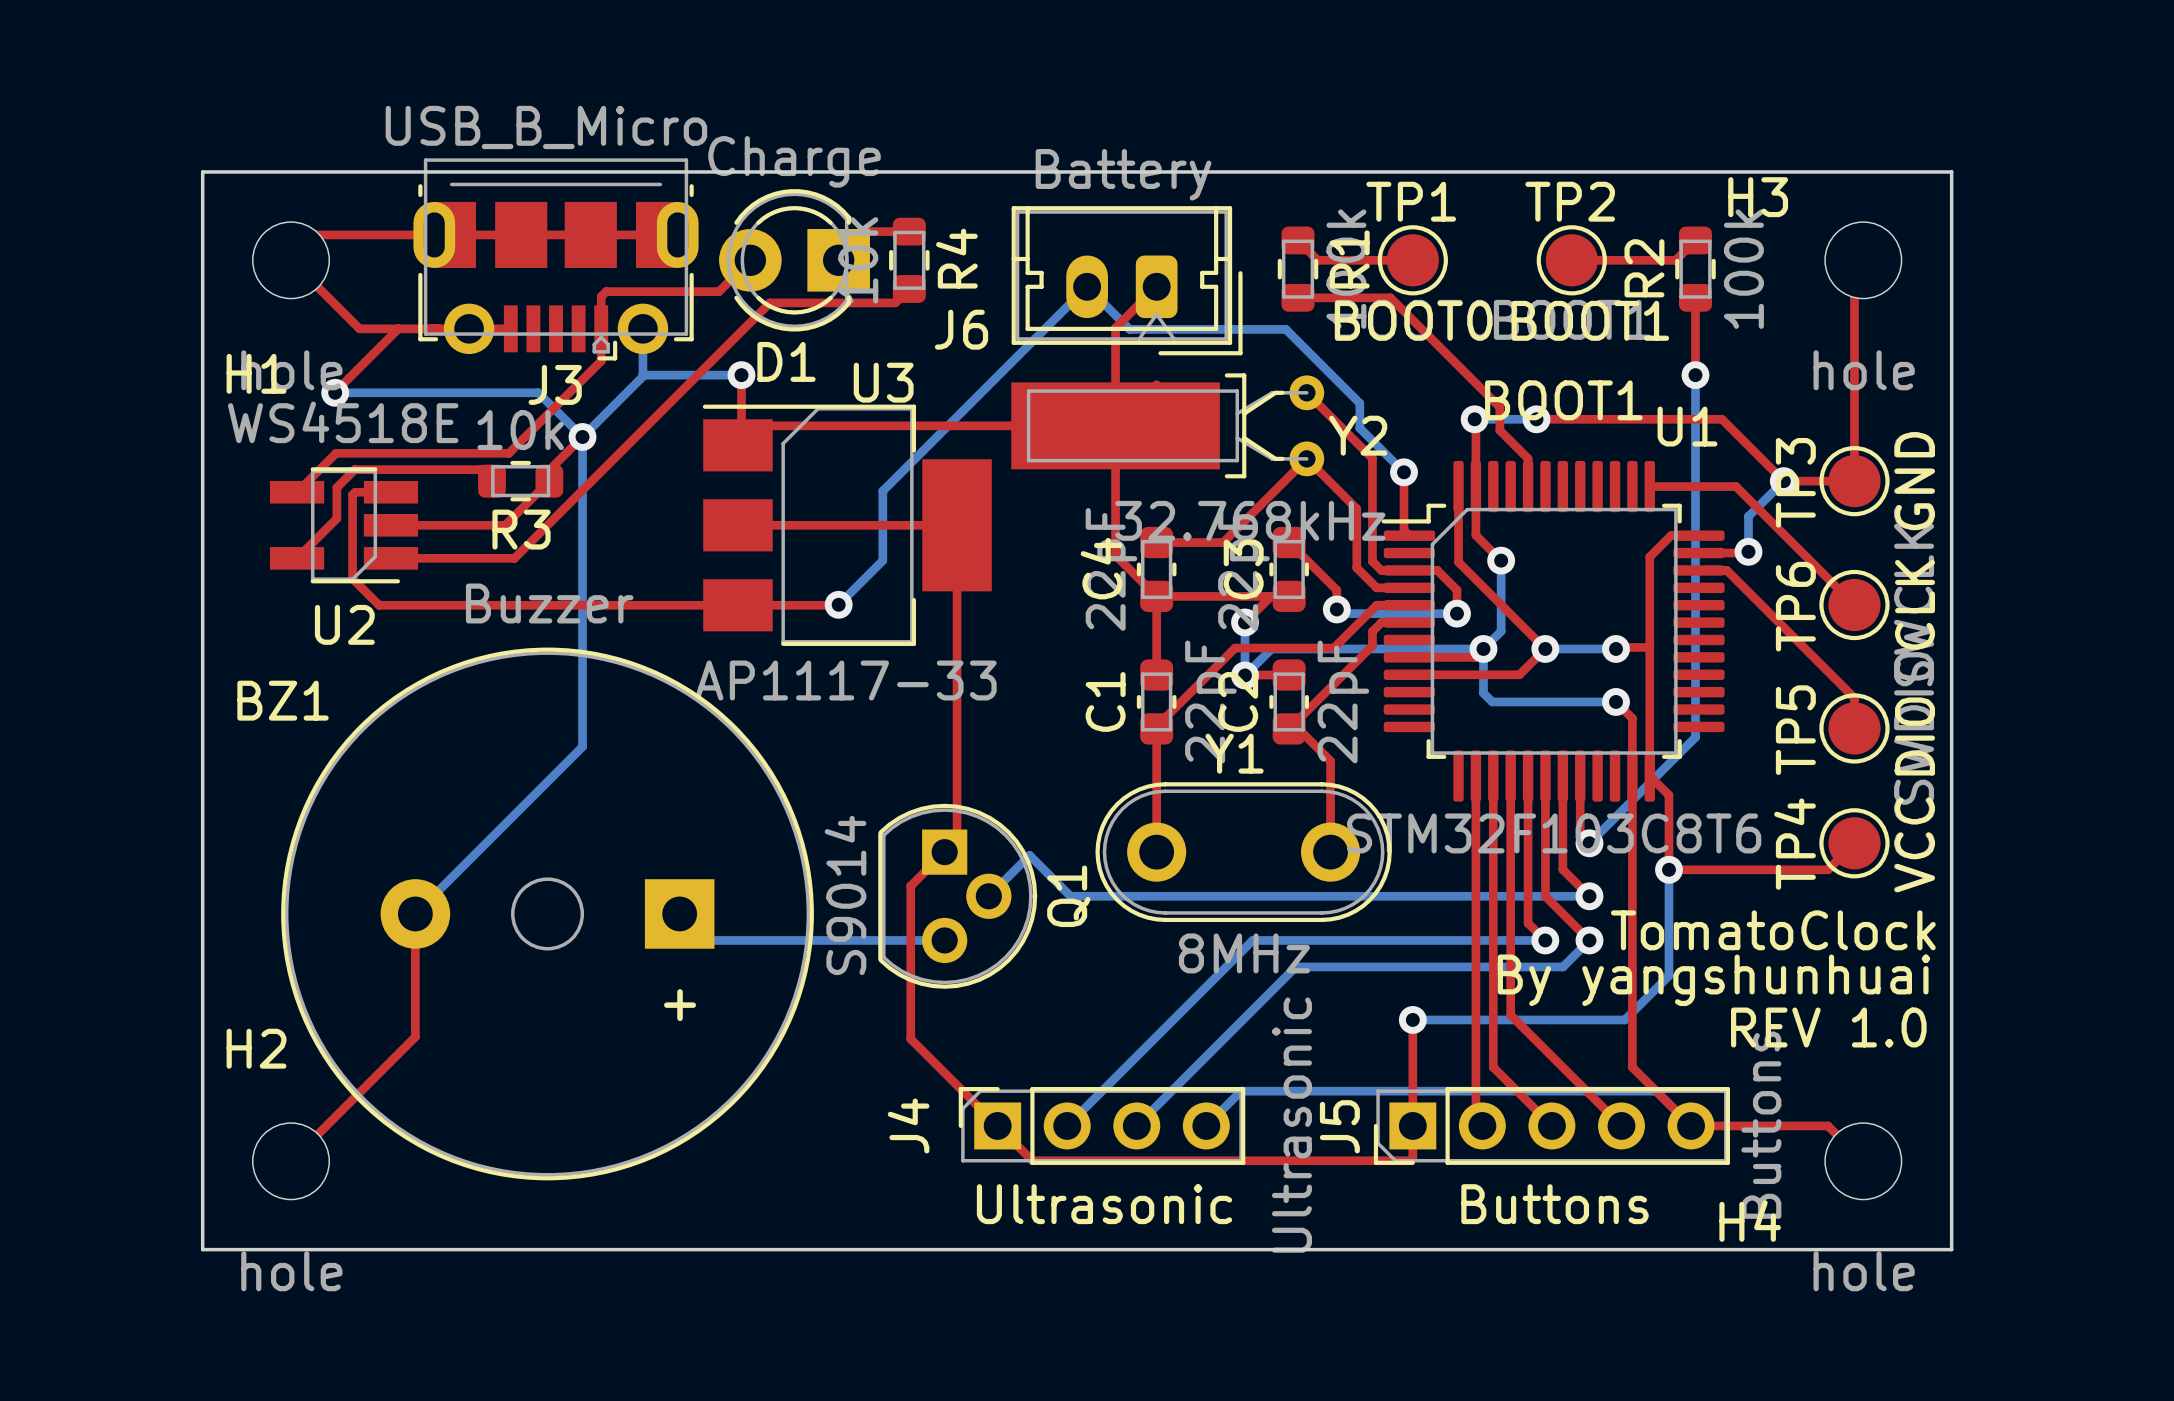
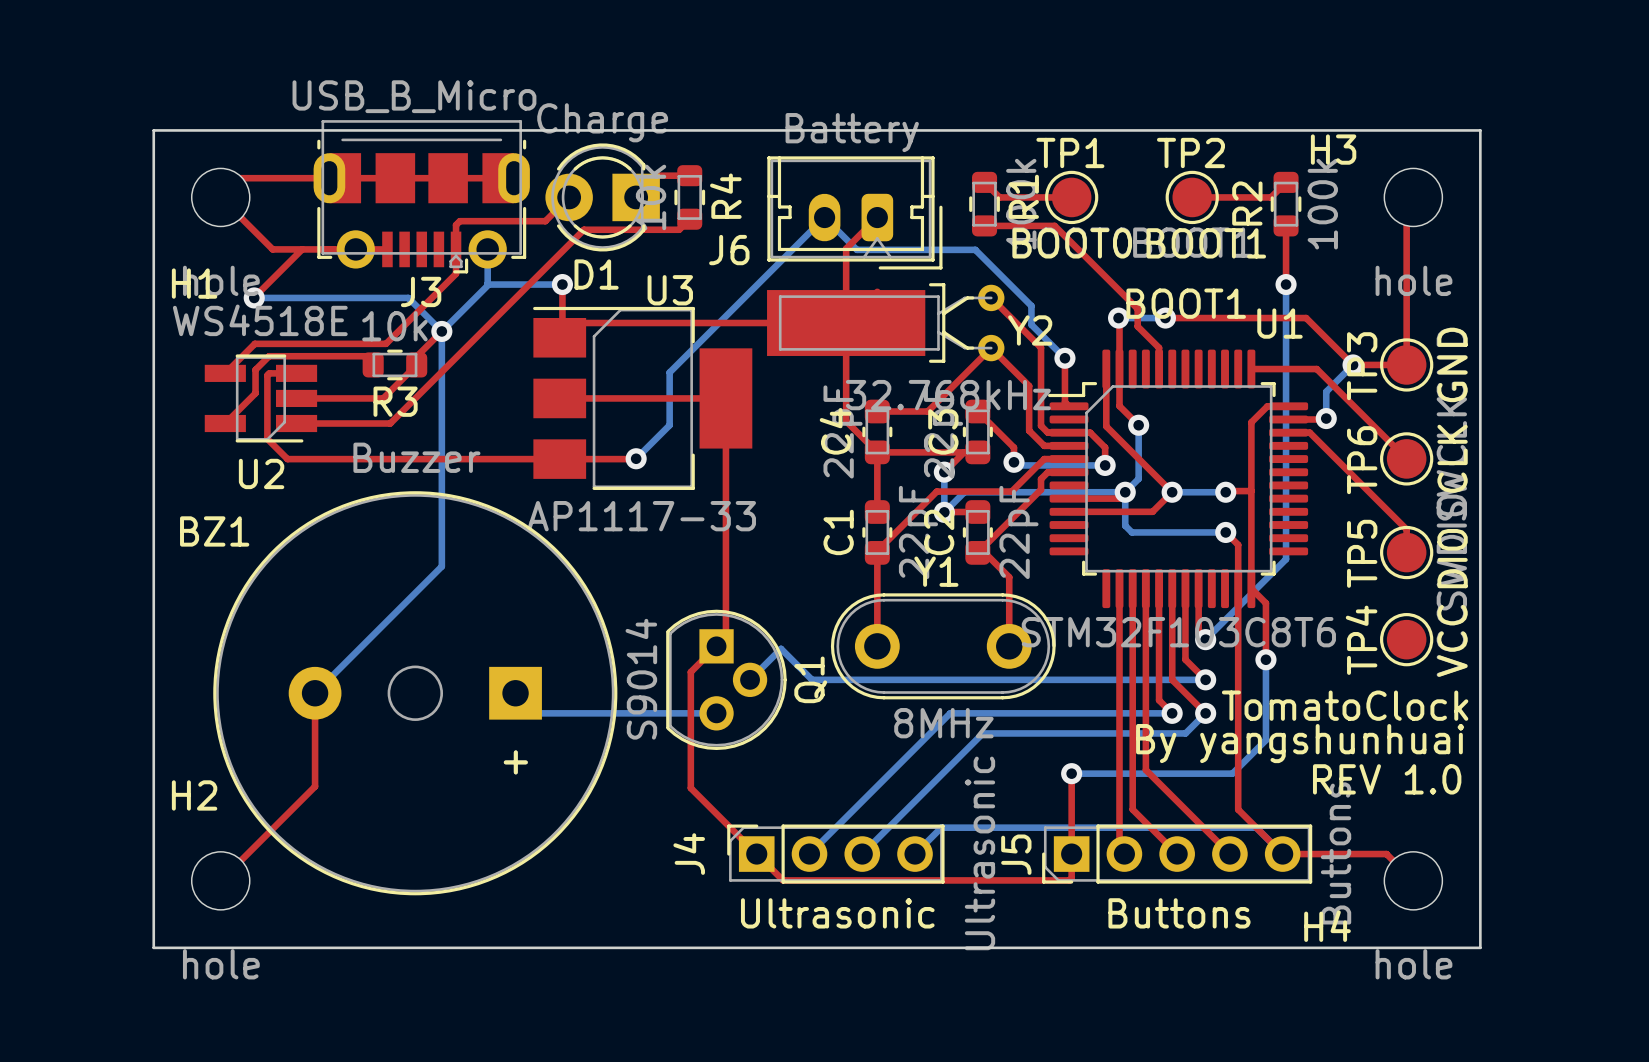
top track: (1854, 843) (1827, 869) (1668, 869) -> none

